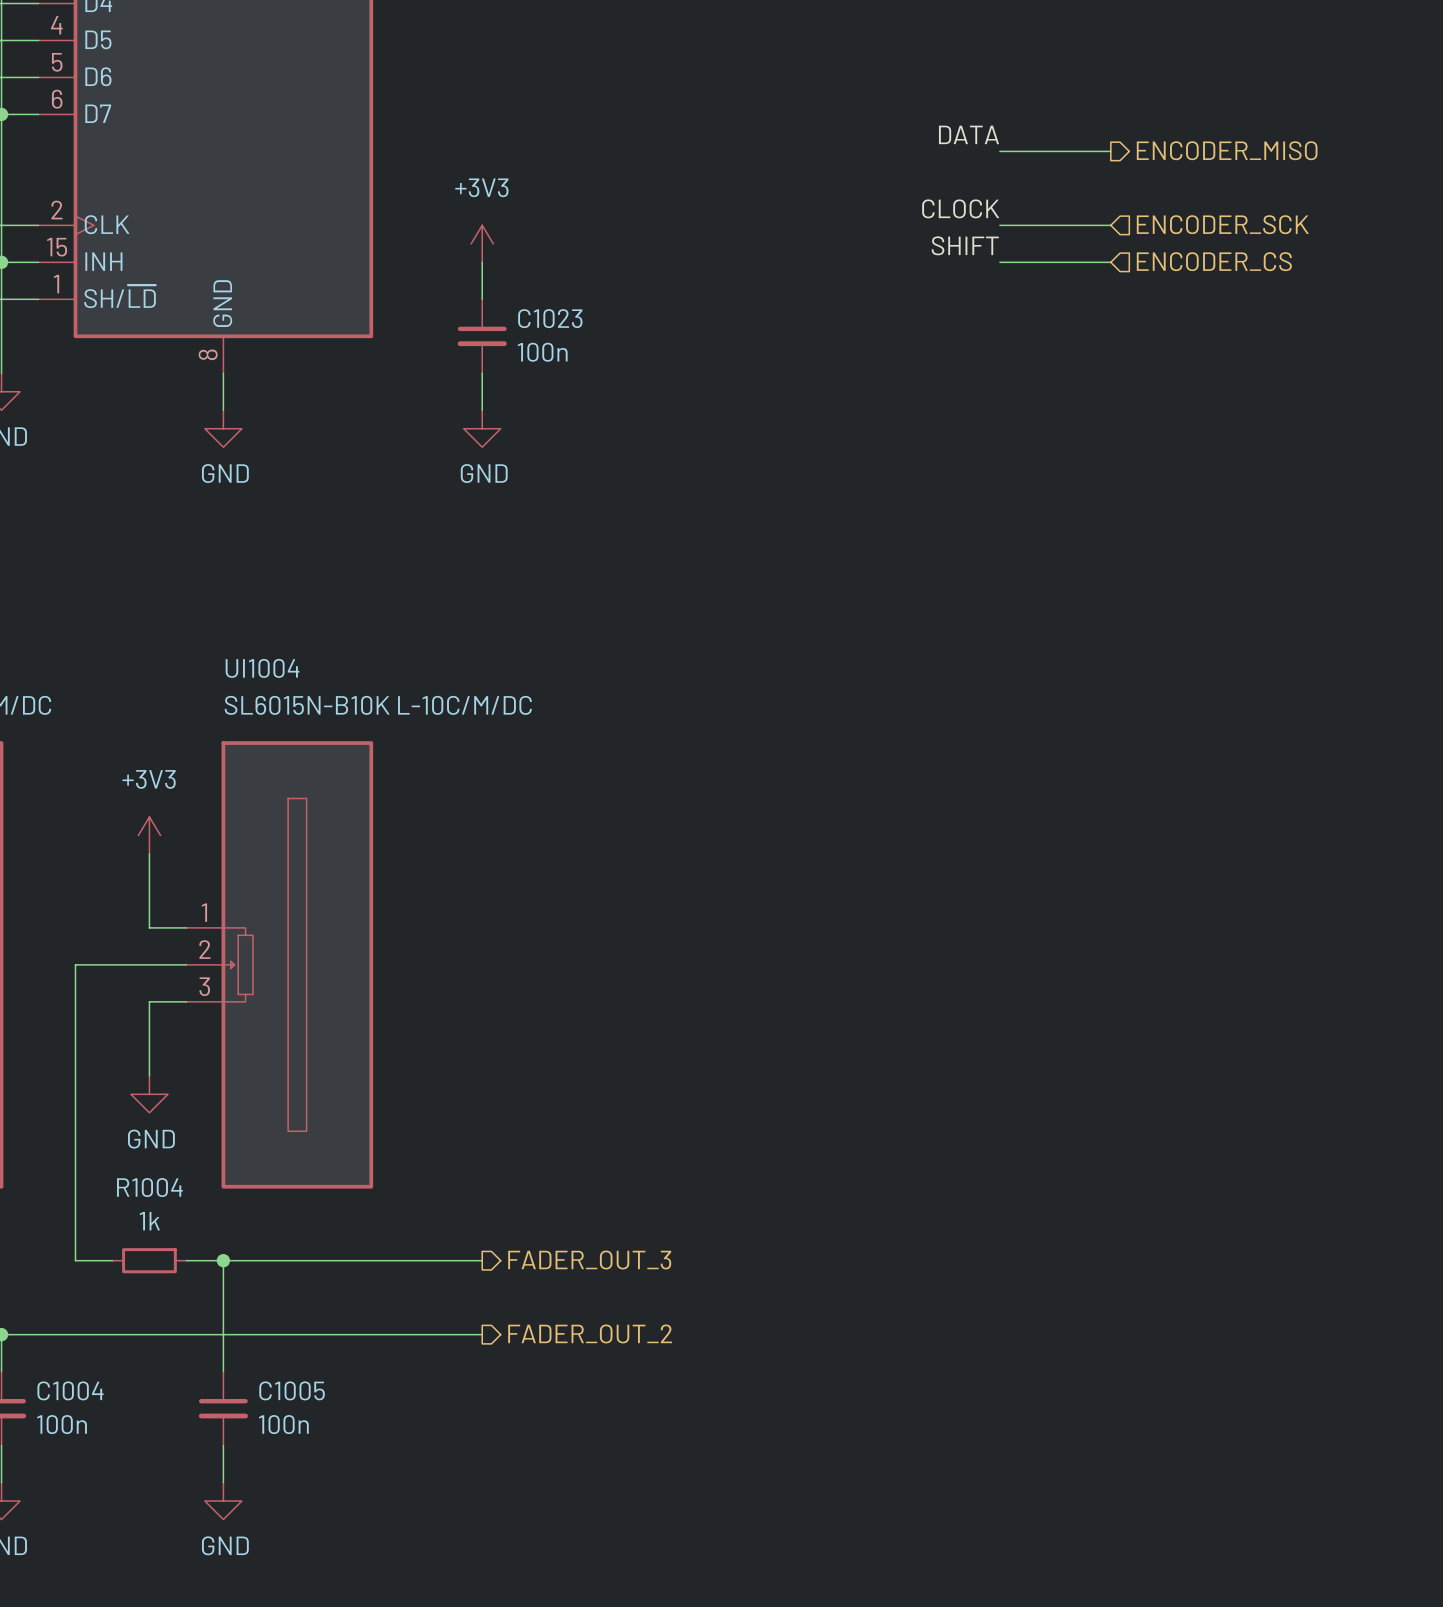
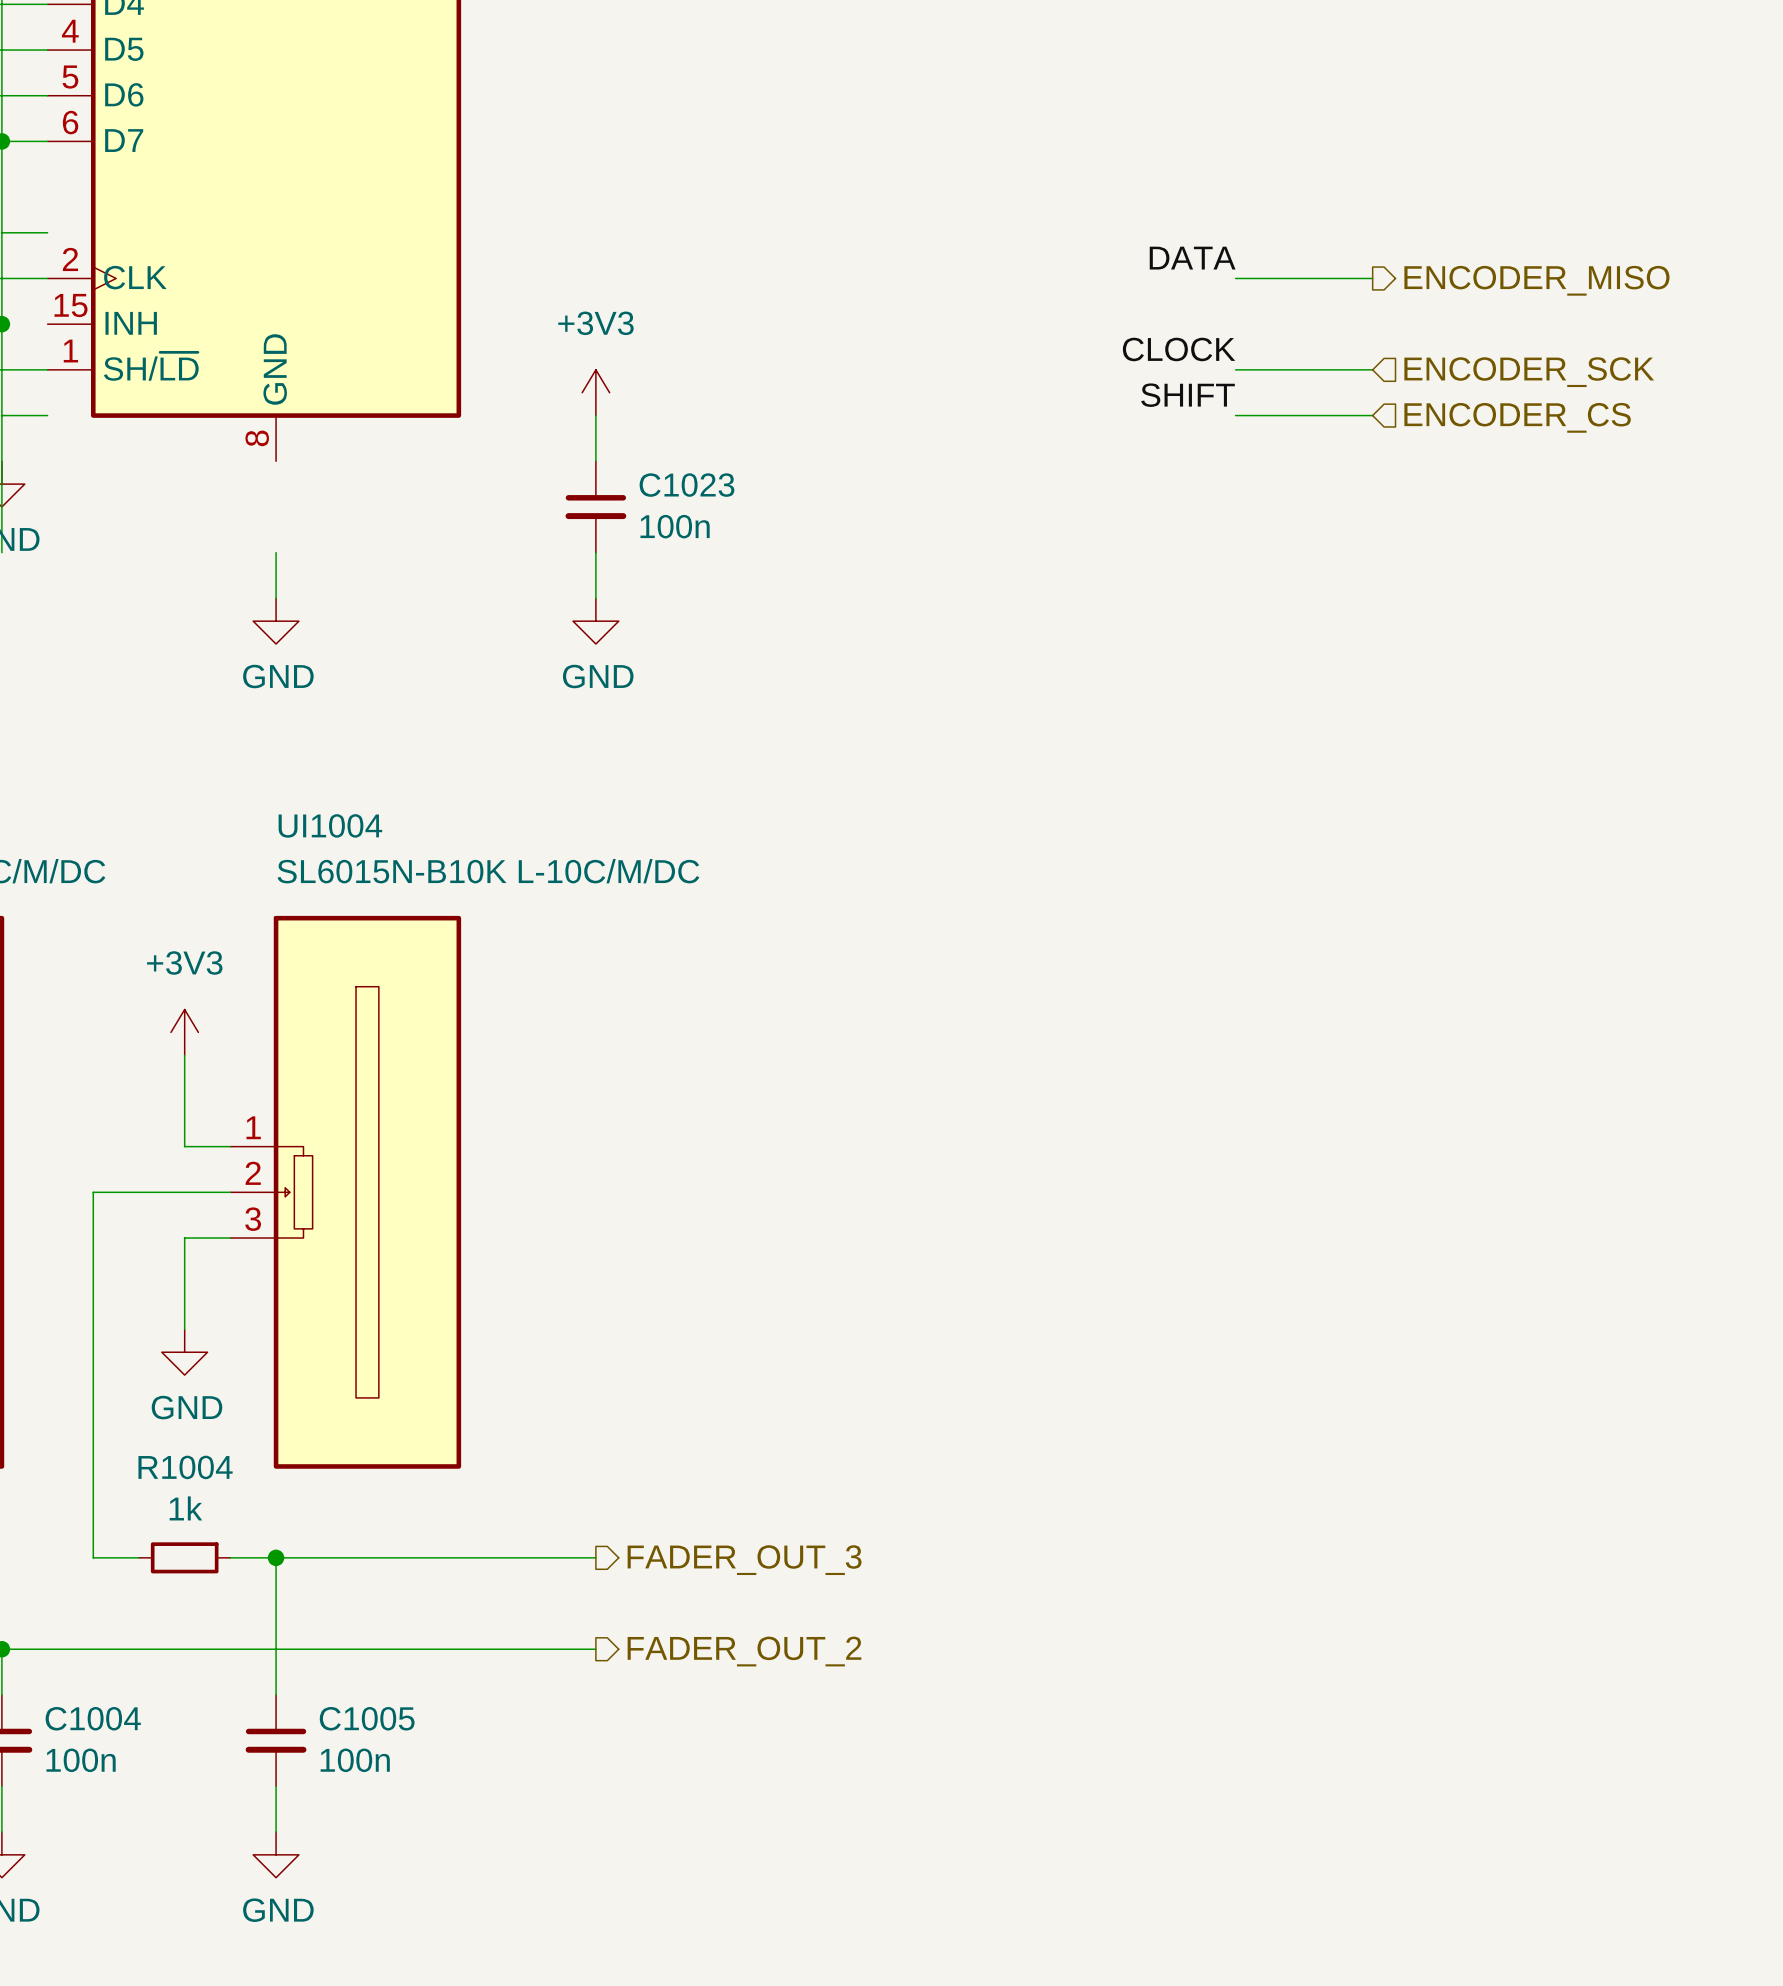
label: DATA (968, 134) -> none
hierarchical label: ENCODER_MISO (1227, 150) -> none
wire: (999, 151) (1110, 151) -> (1235, 369) (1372, 369)
wire: none -> (1, 232) (47, 232)
label: CLOCK (960, 208) -> DATA (1192, 258)
hierarchical label shape: input (1222, 224) -> output (1536, 280)
hierarchical label: ENCODER_SCK (1222, 224) -> ENCODER_MISO (1536, 280)
power symbol position: +3V3 (482, 243) -> +3V3 (595, 392)
label position: SHIFT (965, 245) -> SHIFT (1187, 395)
hierarchical label position: ENCODER_CS (1214, 261) -> ENCODER_CS (1517, 417)
wire: (1, 262) (38, 262) -> (1, 415) (47, 415)
wire: (482, 262) (482, 299) -> (595, 552) (595, 598)
wire: (999, 262) (1110, 262) -> (1235, 415) (1372, 415)
label: none -> CLOCK (1179, 349)
hierarchical label: none -> ENCODER_SCK (1529, 372)
C1023 position: (482, 336) -> (595, 506)
wire: none -> (1, 461) (1, 552)
wire: (223, 373) (223, 410) -> (276, 552) (276, 598)
power symbol position: GND (223, 428) -> GND (276, 621)
power symbol position: GND (482, 428) -> GND (595, 621)

